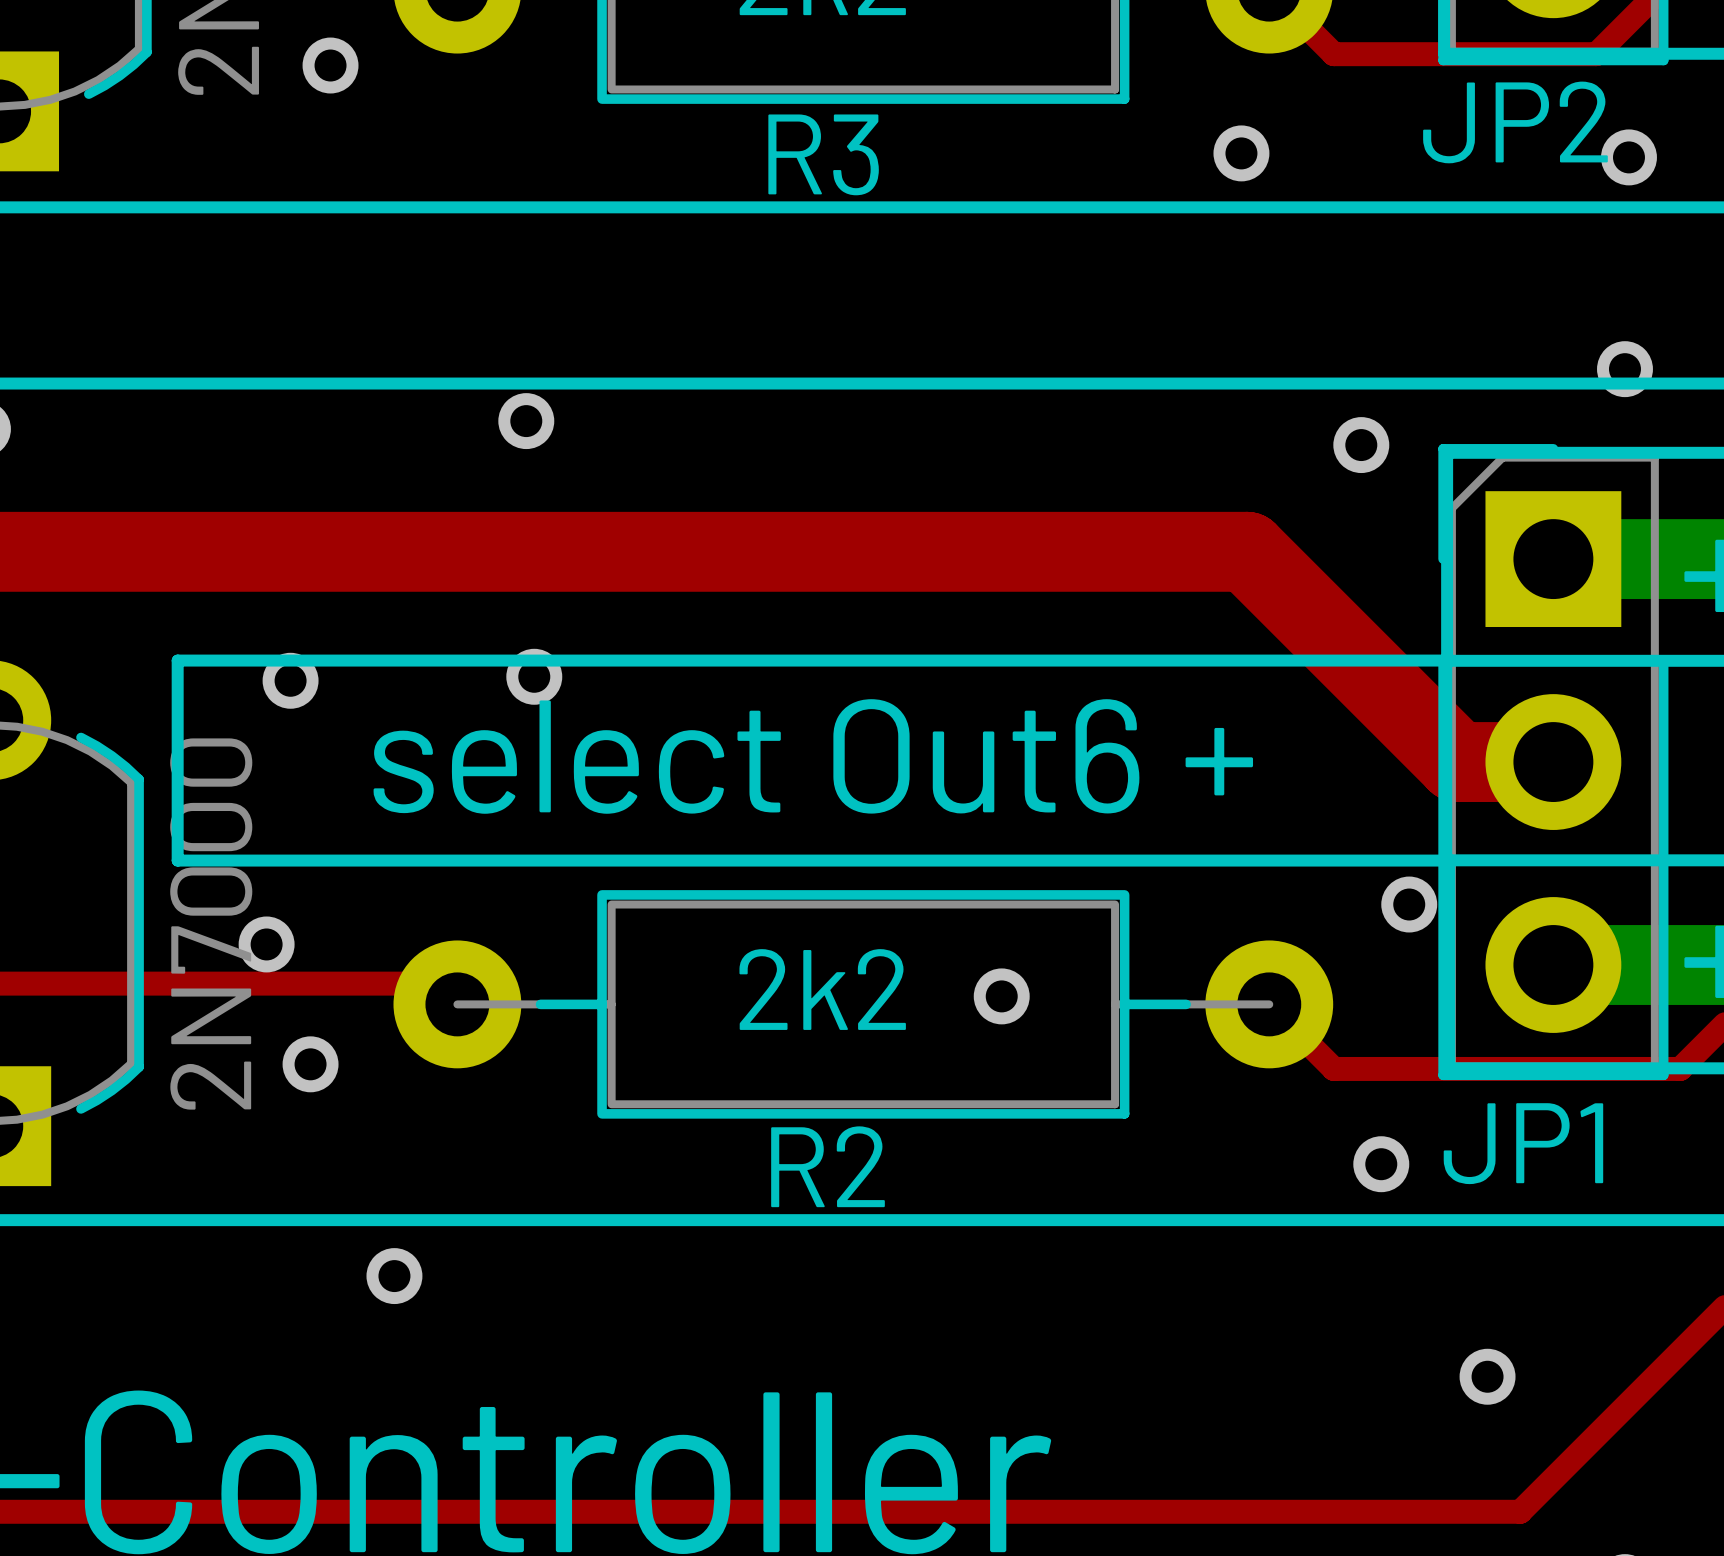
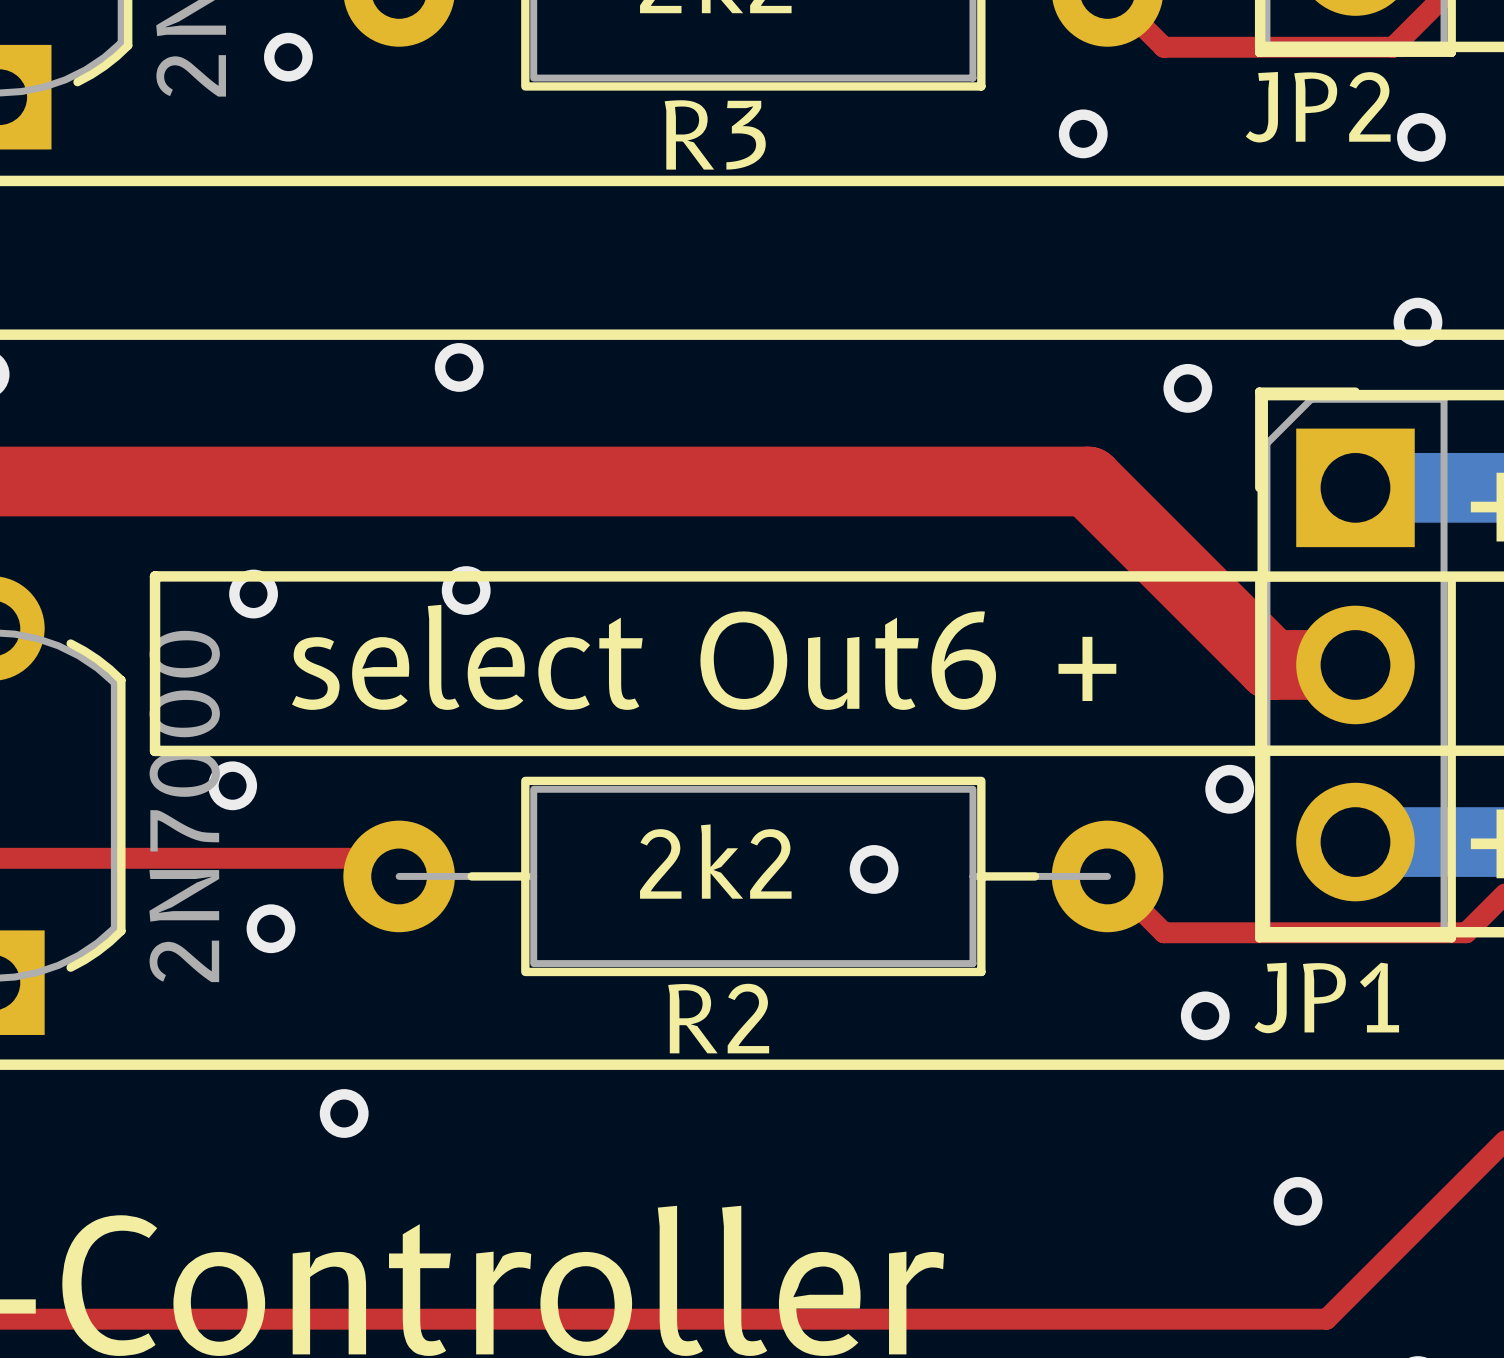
via position: (266, 944) -> (232, 785)

